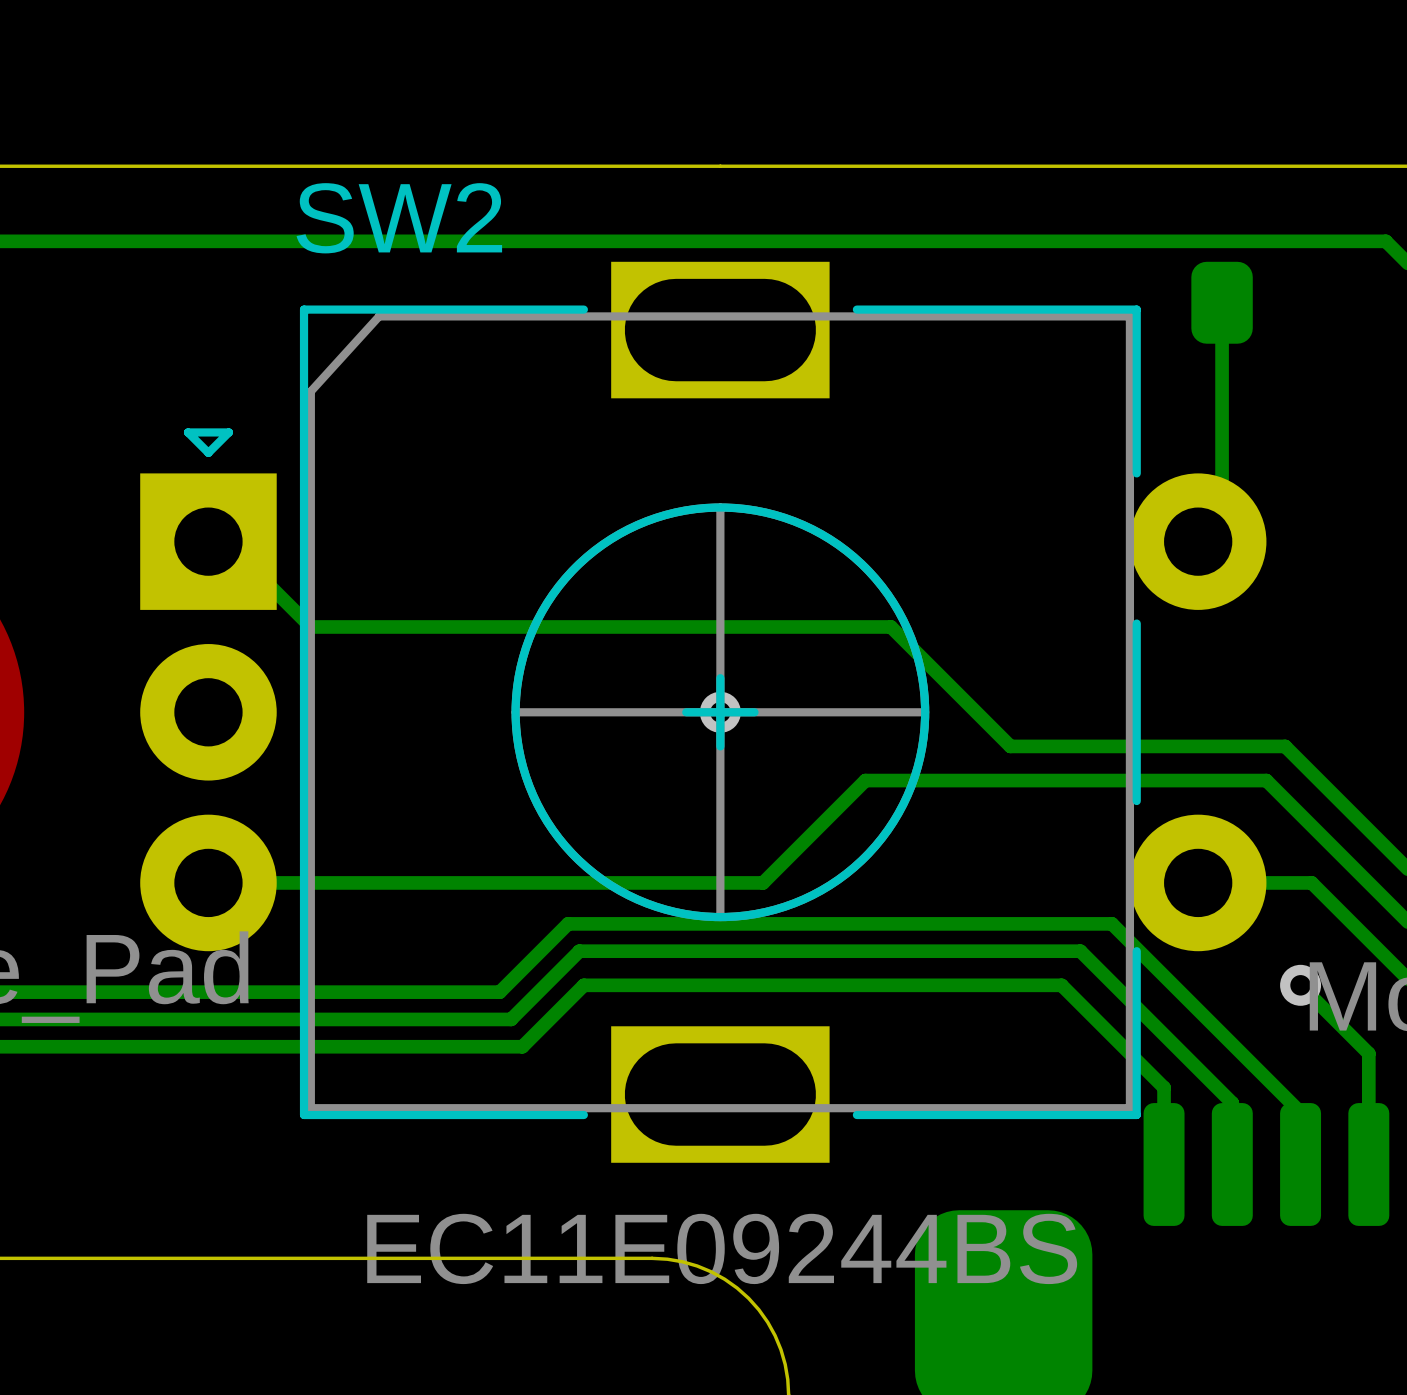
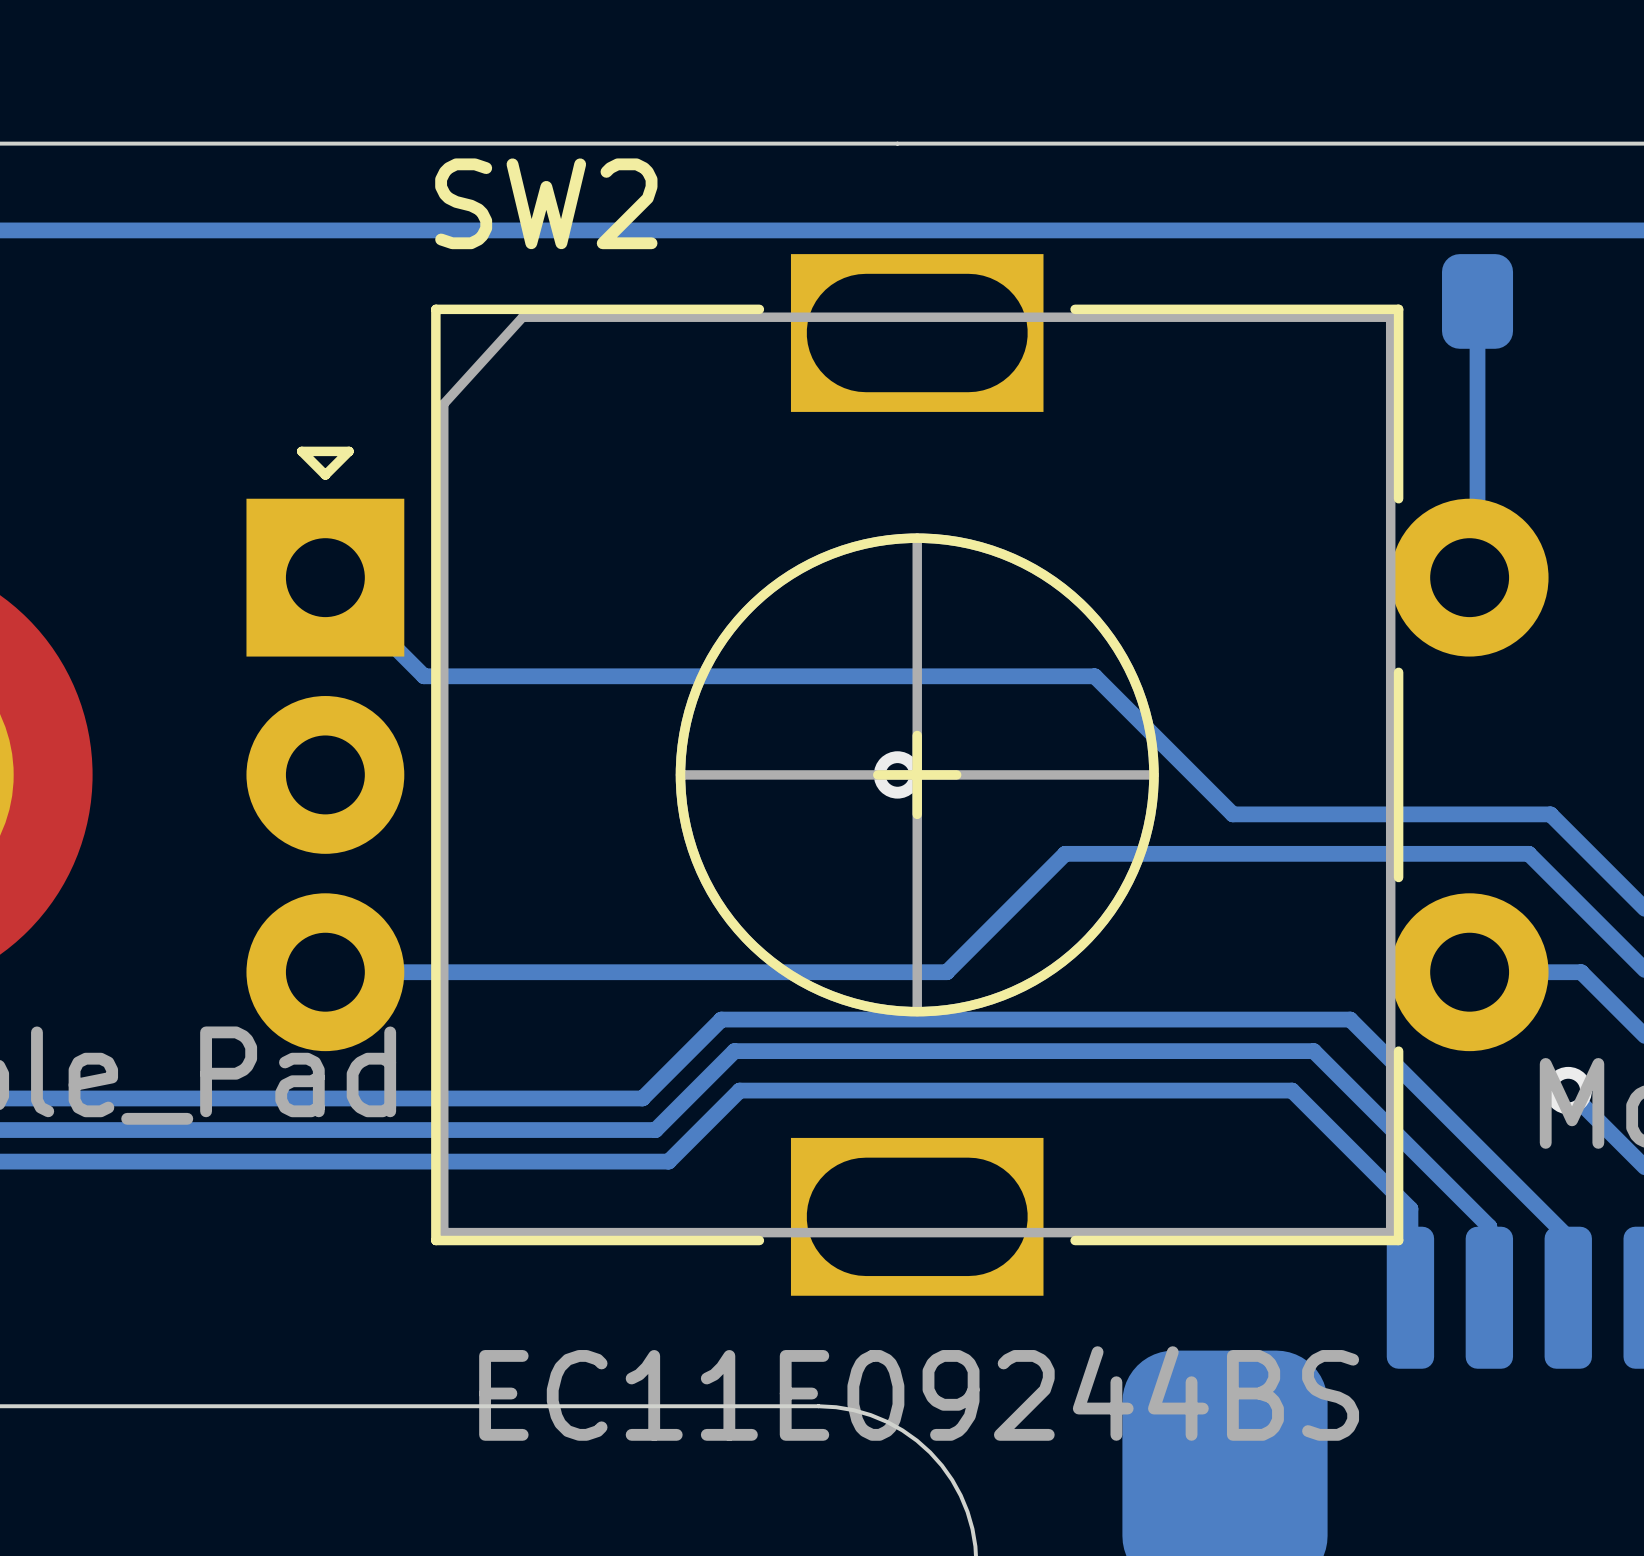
SW2 position: (703, 712) -> (897, 774)

